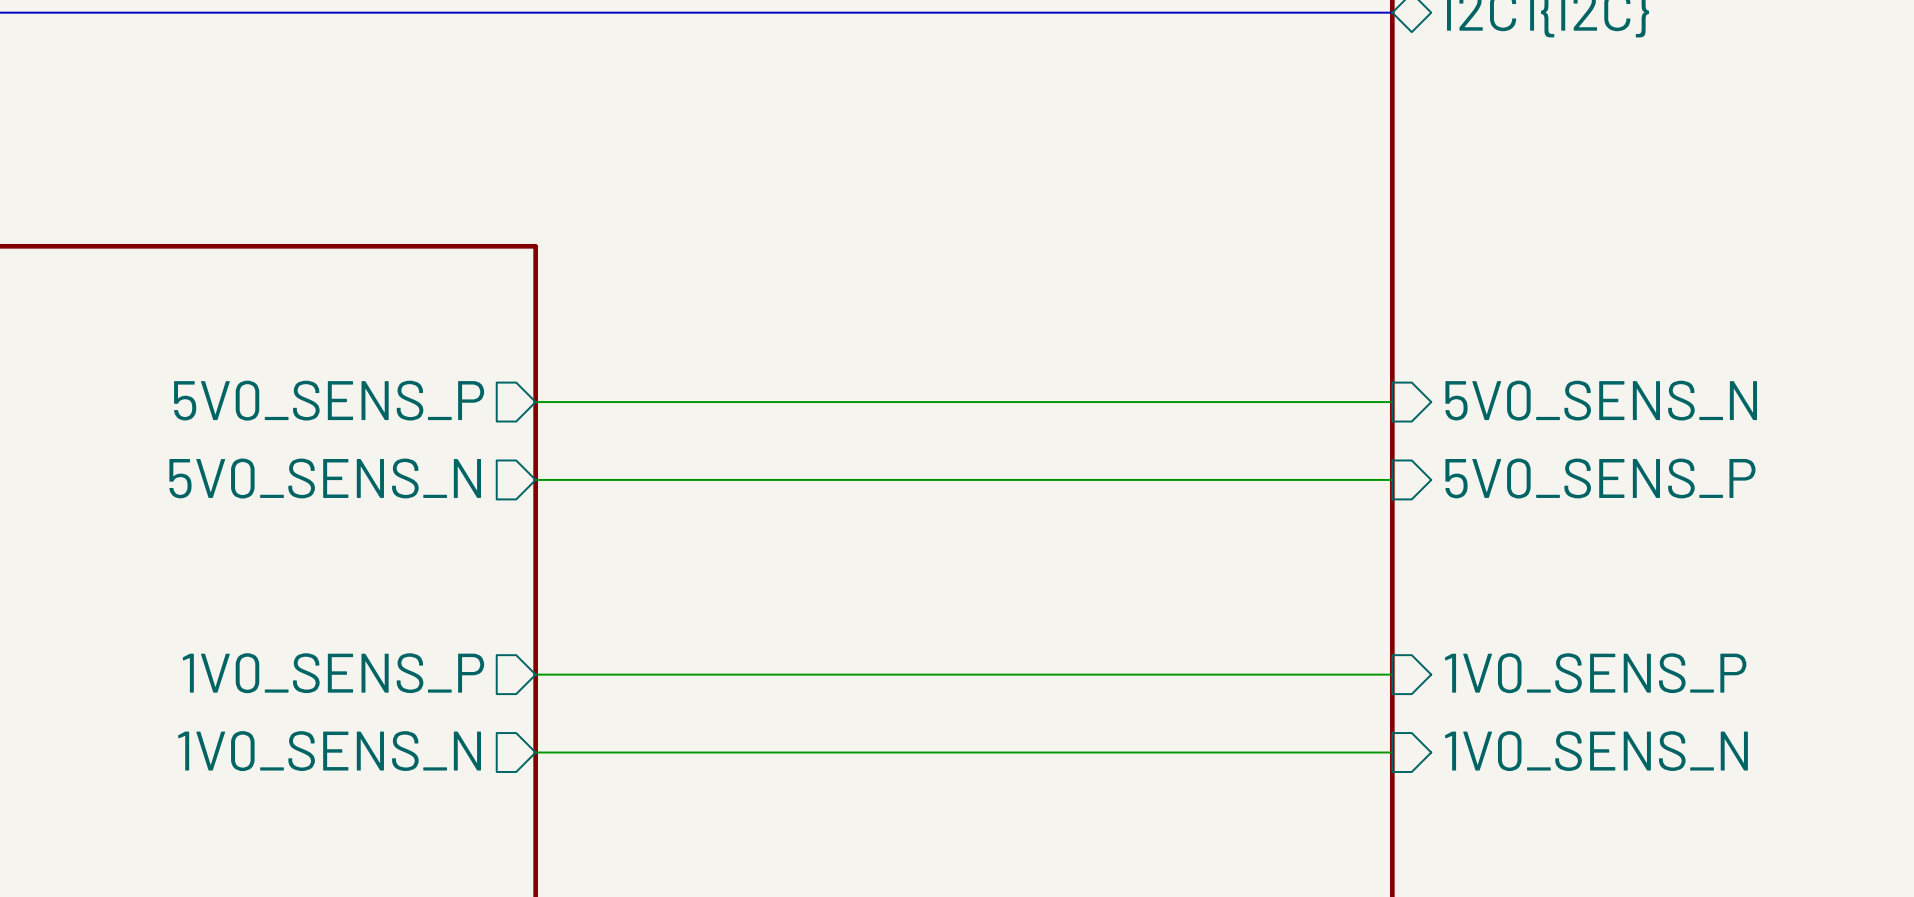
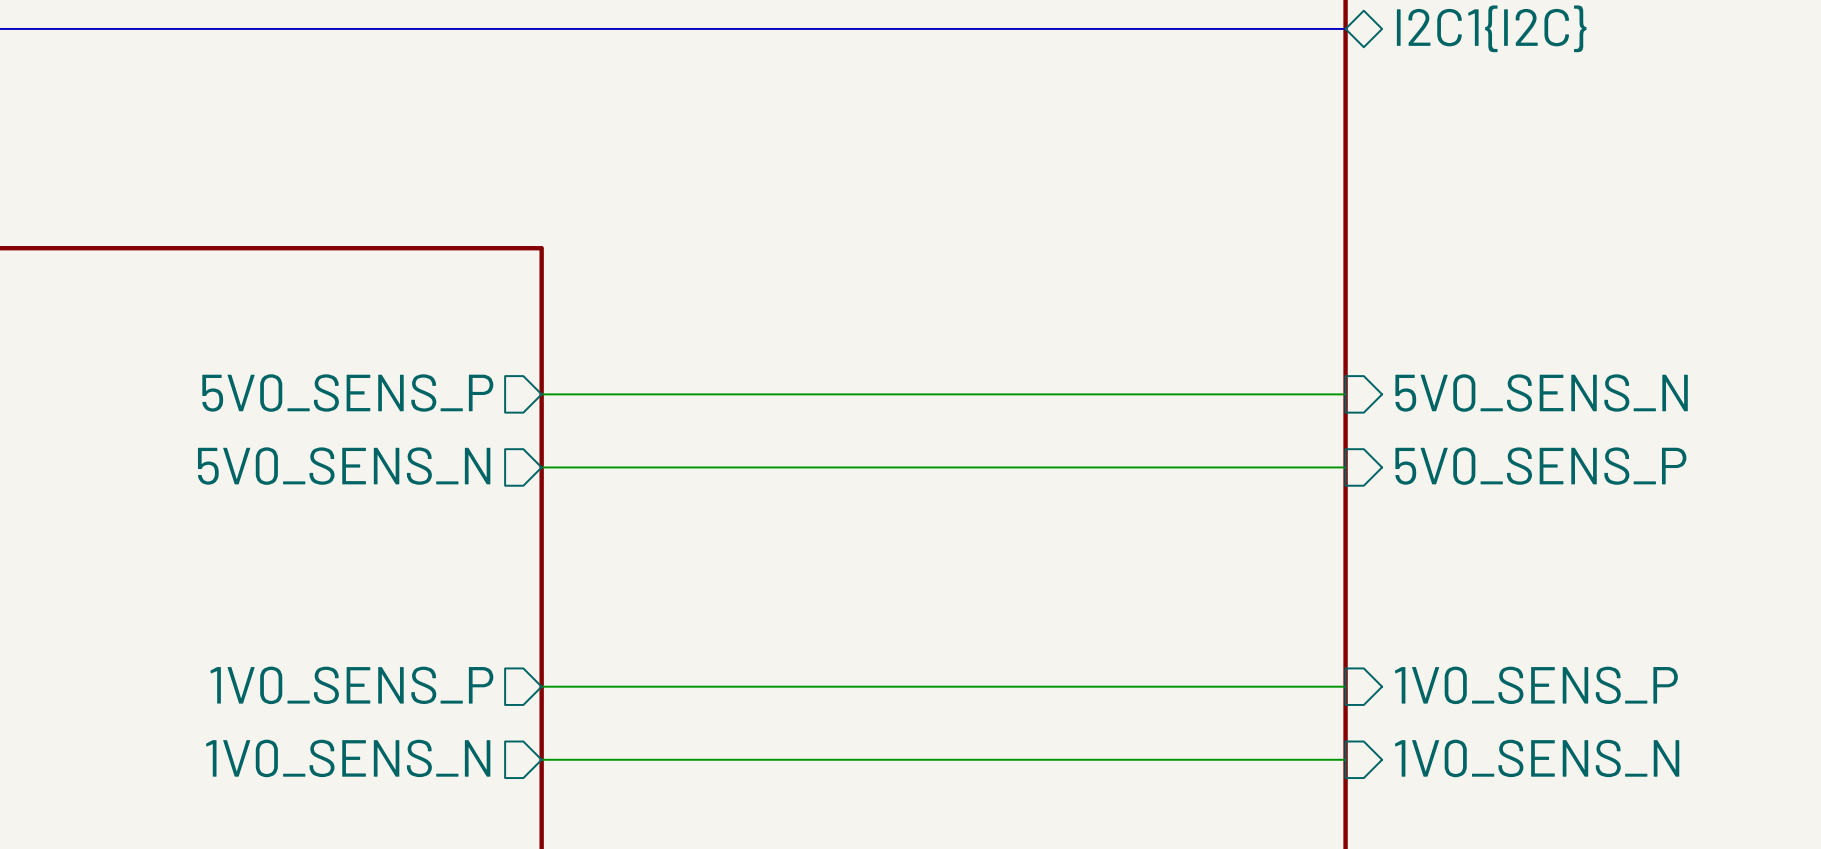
sheet pin position: 1V0_SENS_P (333, 673) -> 1V0_SENS_P (351, 685)
sheet pin position: 1V0_SENS_P (1595, 673) -> 1V0_SENS_P (1536, 685)
wire: (535, 674) (1392, 674) -> (541, 686) (1345, 686)
sheet pin position: 1V0_SENS_N (329, 751) -> 1V0_SENS_N (348, 758)
sheet pin position: 1V0_SENS_N (1596, 751) -> 1V0_SENS_N (1537, 758)
wire: (535, 752) (1392, 752) -> (541, 759) (1345, 759)

